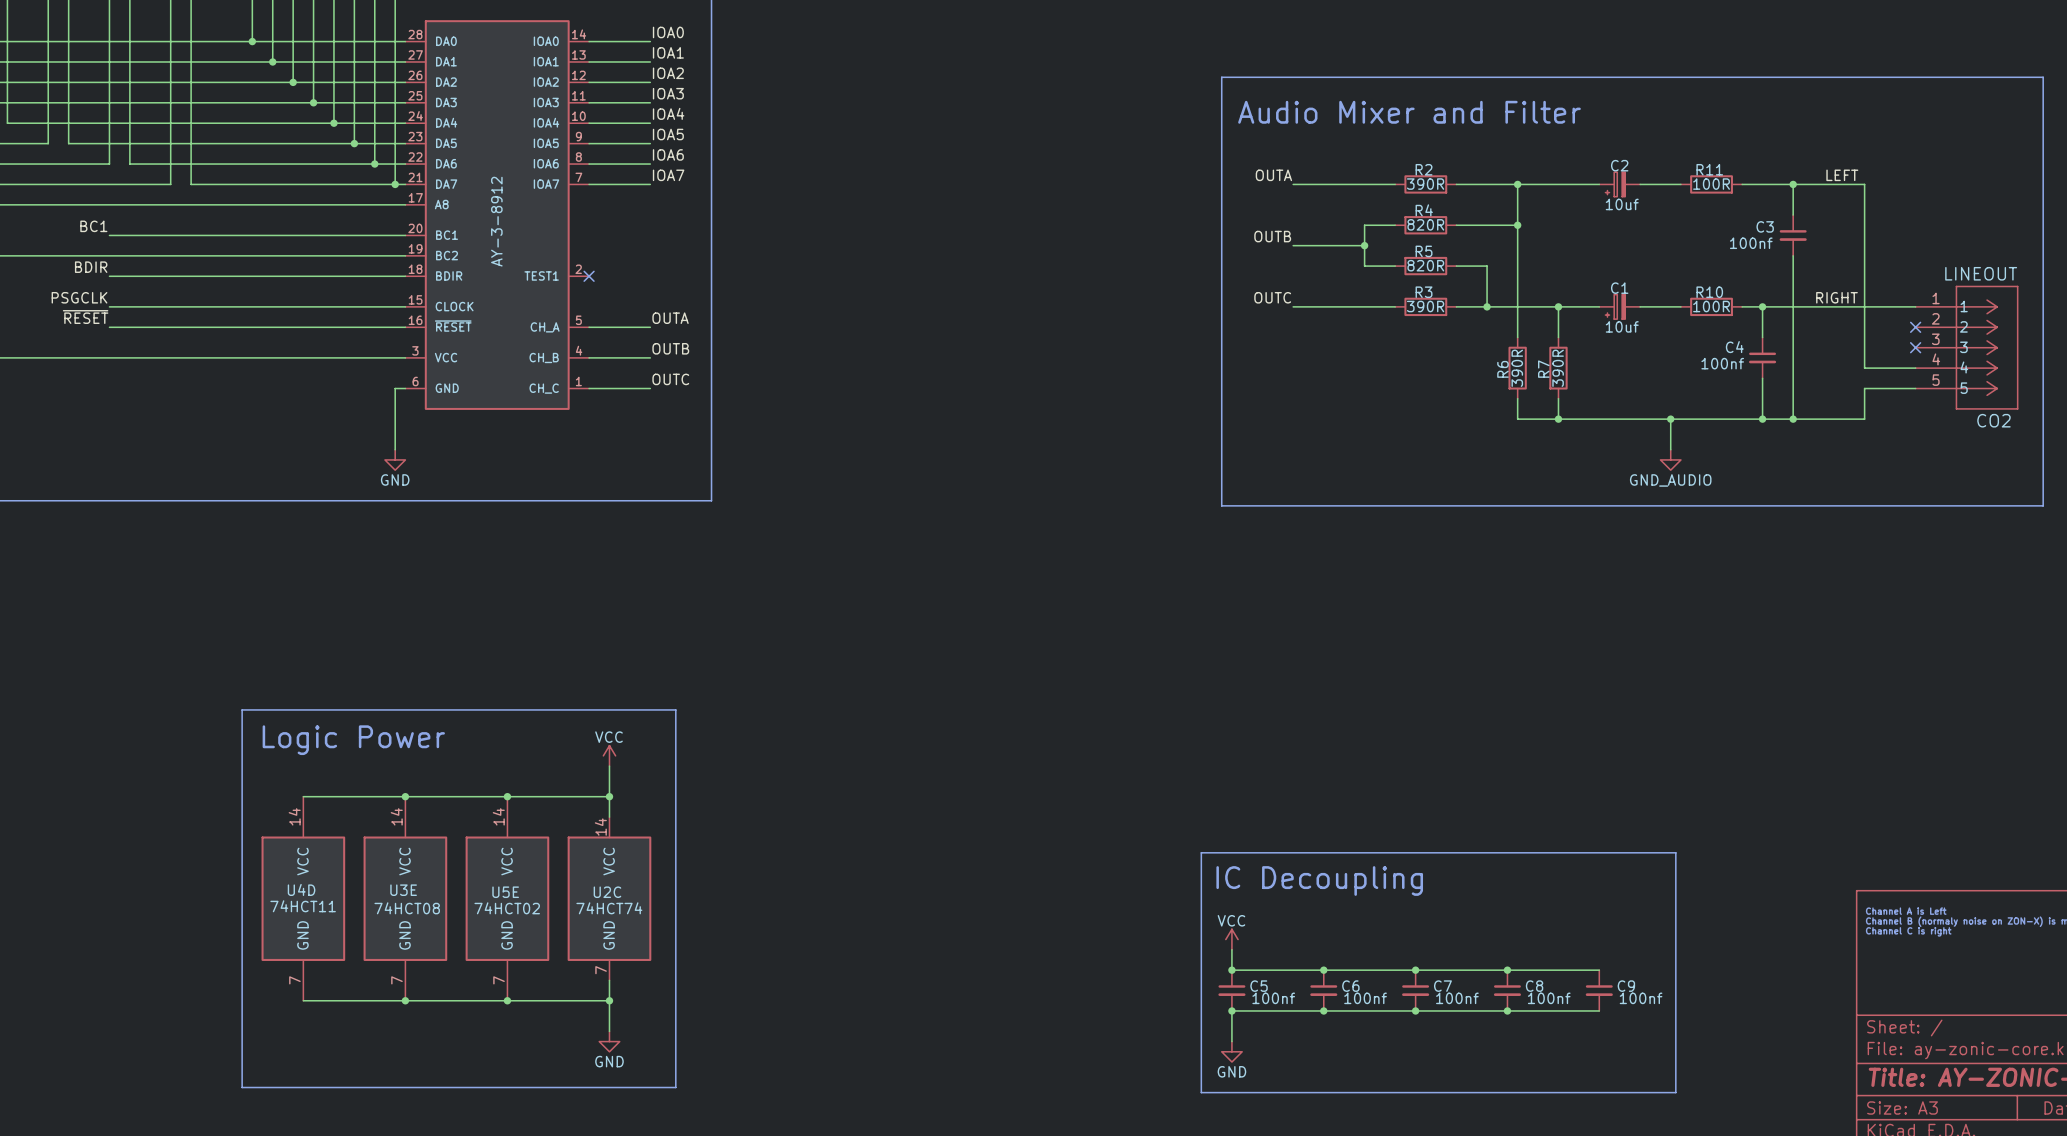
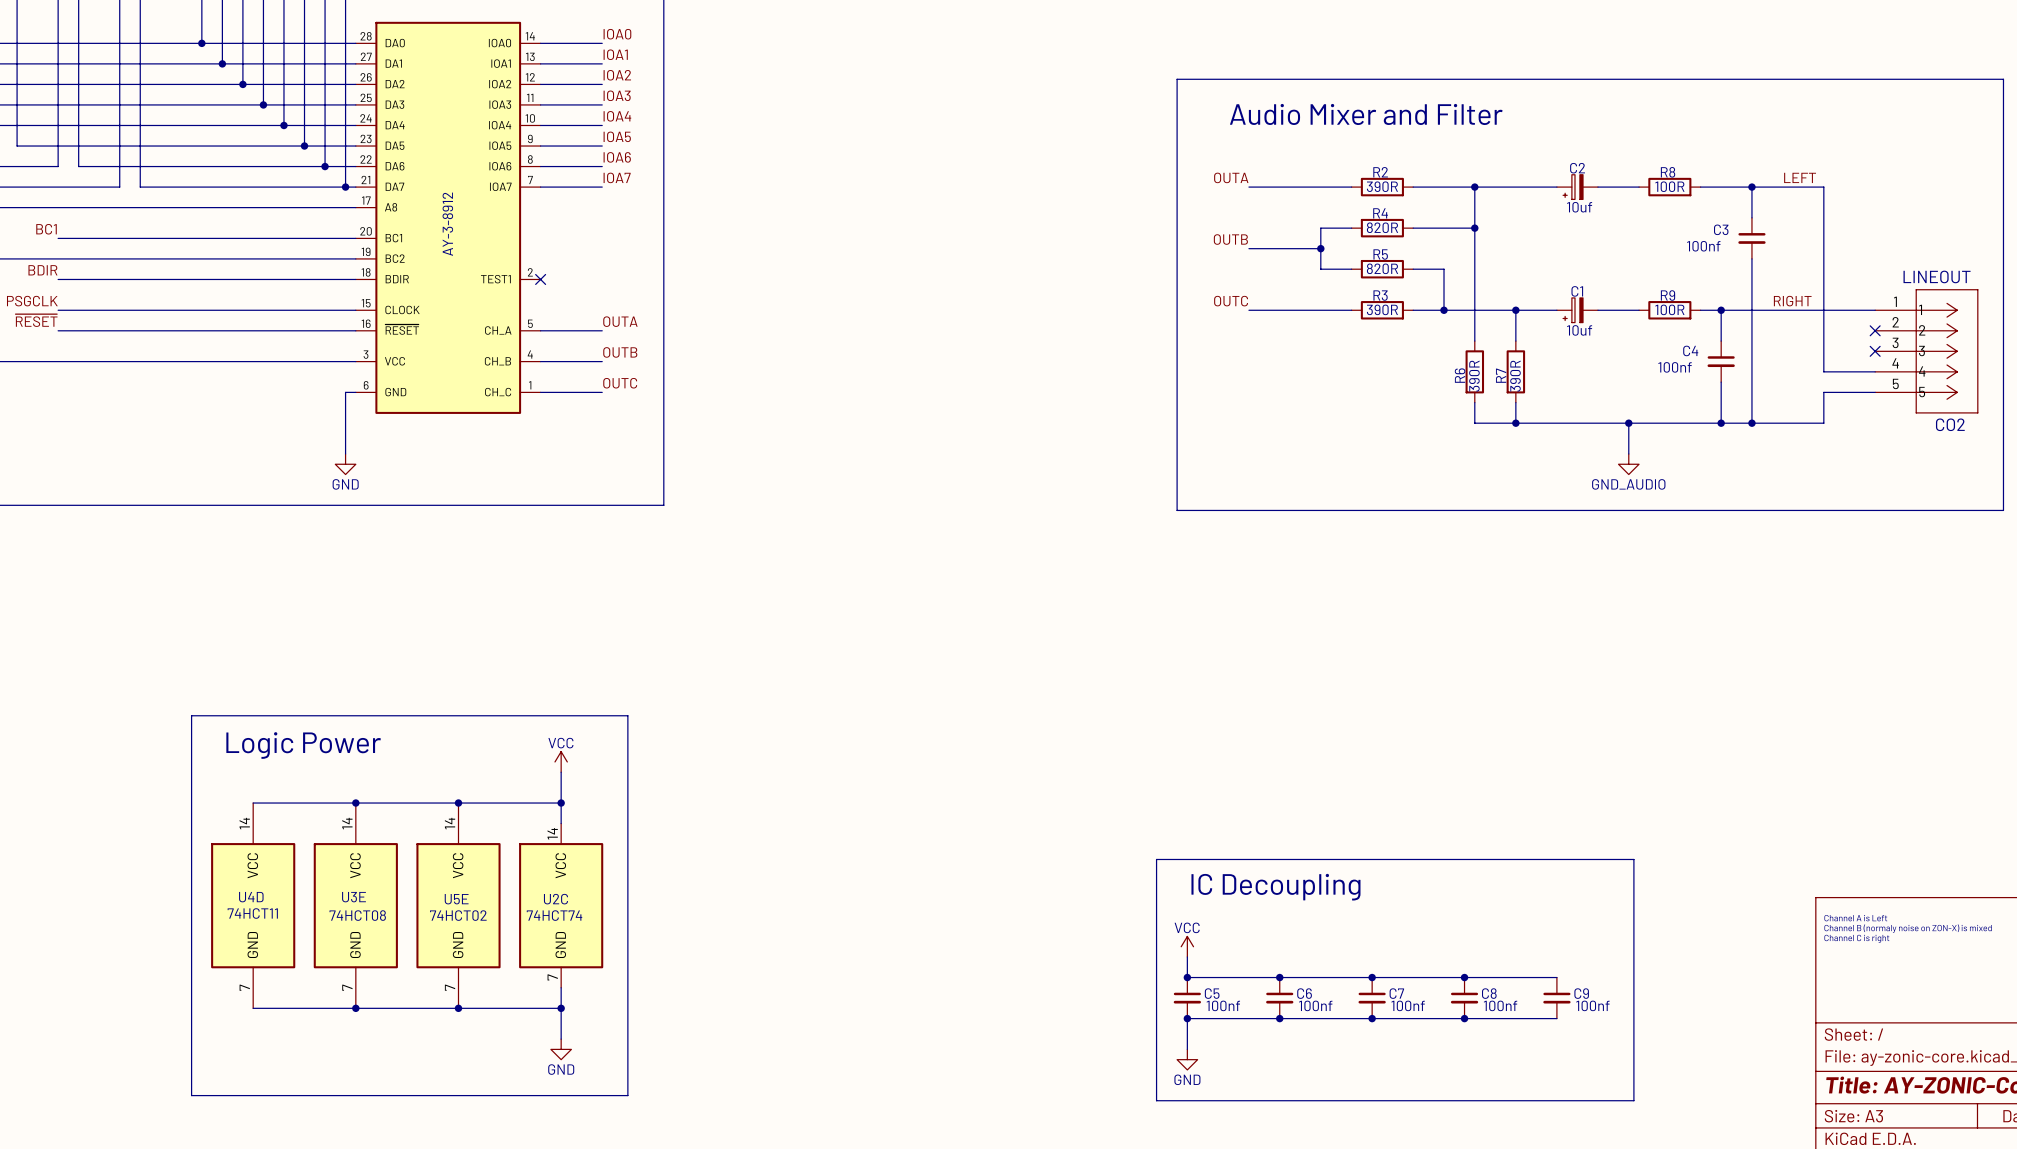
R11 name: R11 (1709, 169) -> R8 (1668, 172)
R10 name: R10 (1709, 292) -> R9 (1668, 295)

